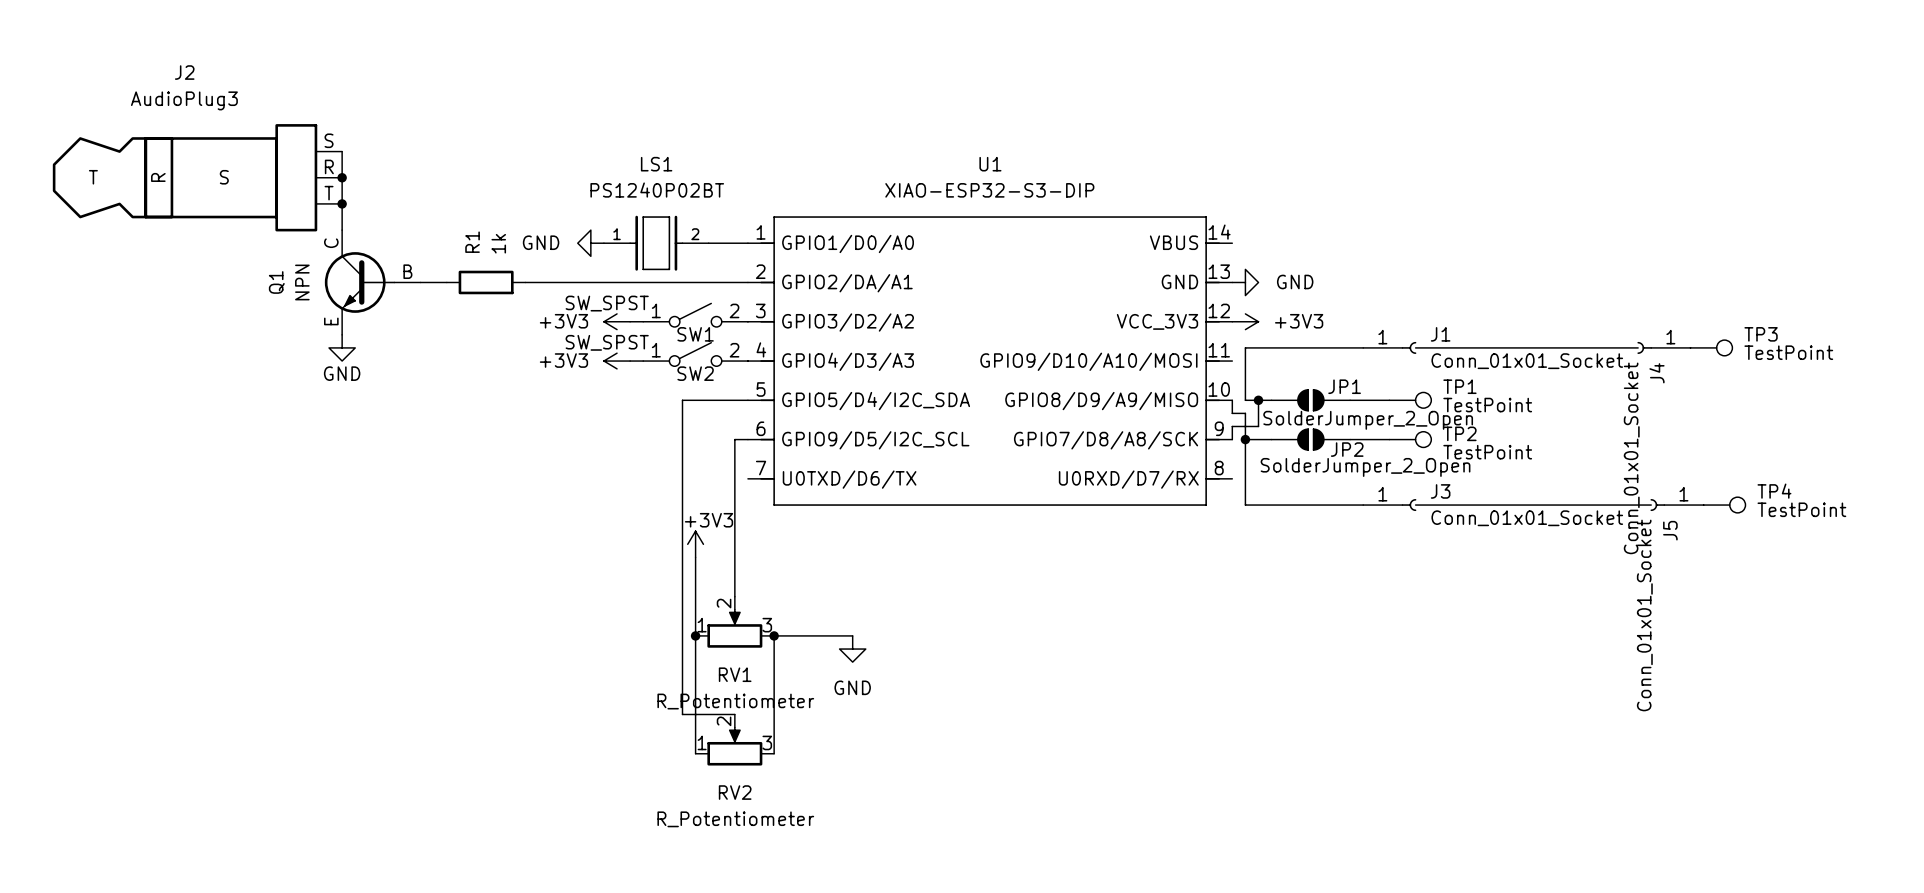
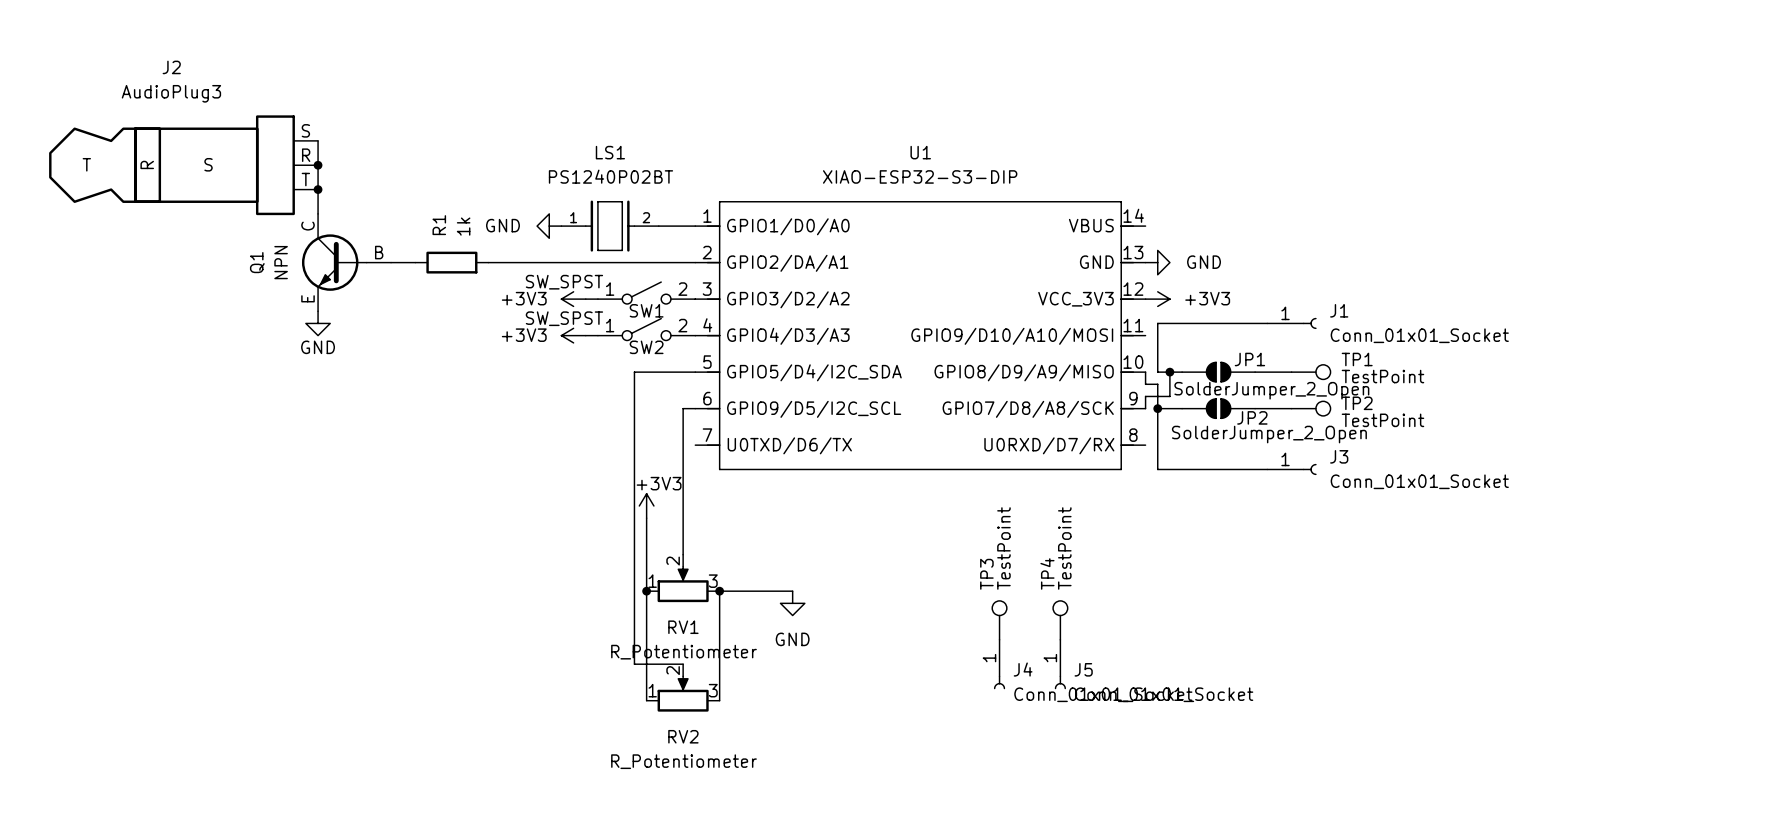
wire: (1415, 347) (1638, 347) -> none
J4 rotation: 0° (1644, 347) -> 90° counterclockwise (999, 682)
J4 position: (1663, 347) -> (999, 664)
TP3 position: (1711, 347) -> (999, 620)
TP3 rotation: 0° (1724, 347) -> 90° counterclockwise (999, 608)
wire: (1415, 505) (1651, 505) -> none
J5 rotation: 0° (1657, 505) -> 90° counterclockwise (1060, 682)
J5 position: (1677, 505) -> (1060, 664)
TP4 position: (1724, 505) -> (1060, 620)
TP4 rotation: 0° (1737, 505) -> 90° counterclockwise (1060, 608)

